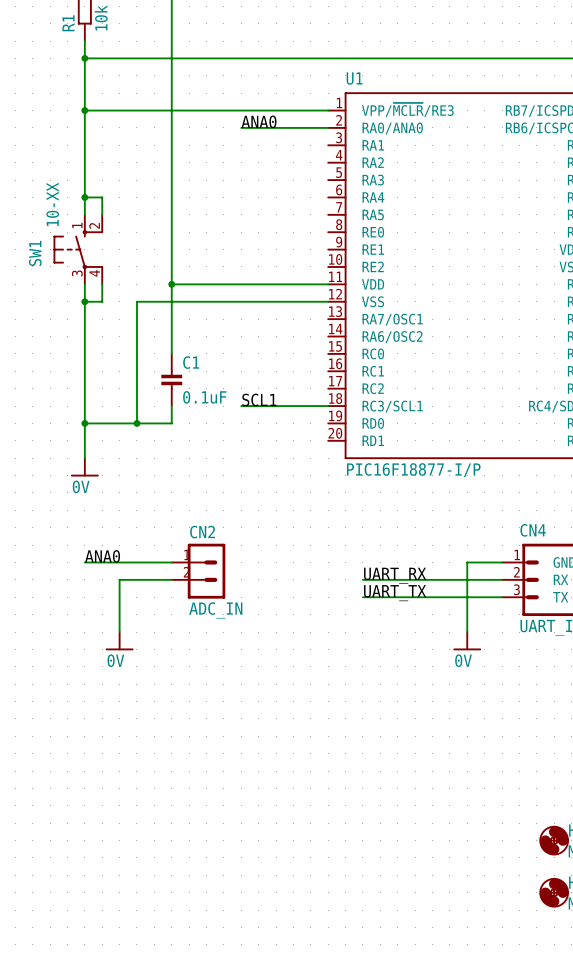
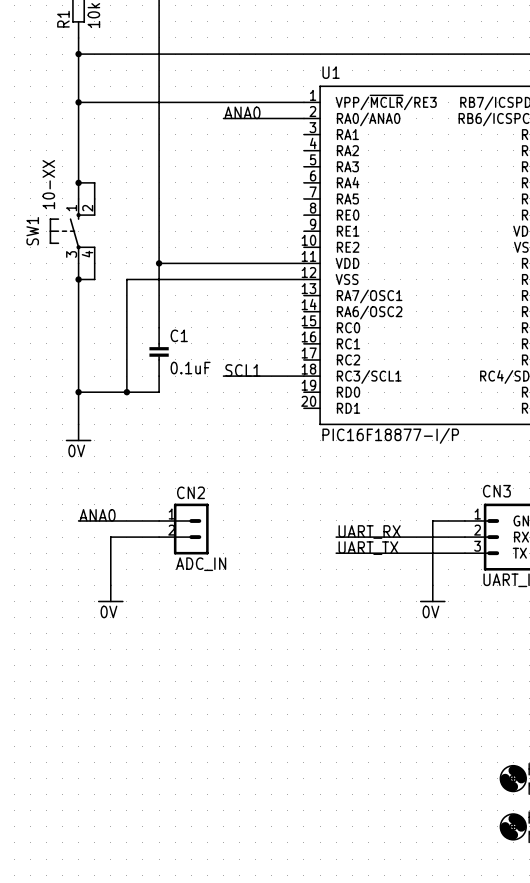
CN4 name: CN4 (533, 530) -> CN3 (496, 491)

